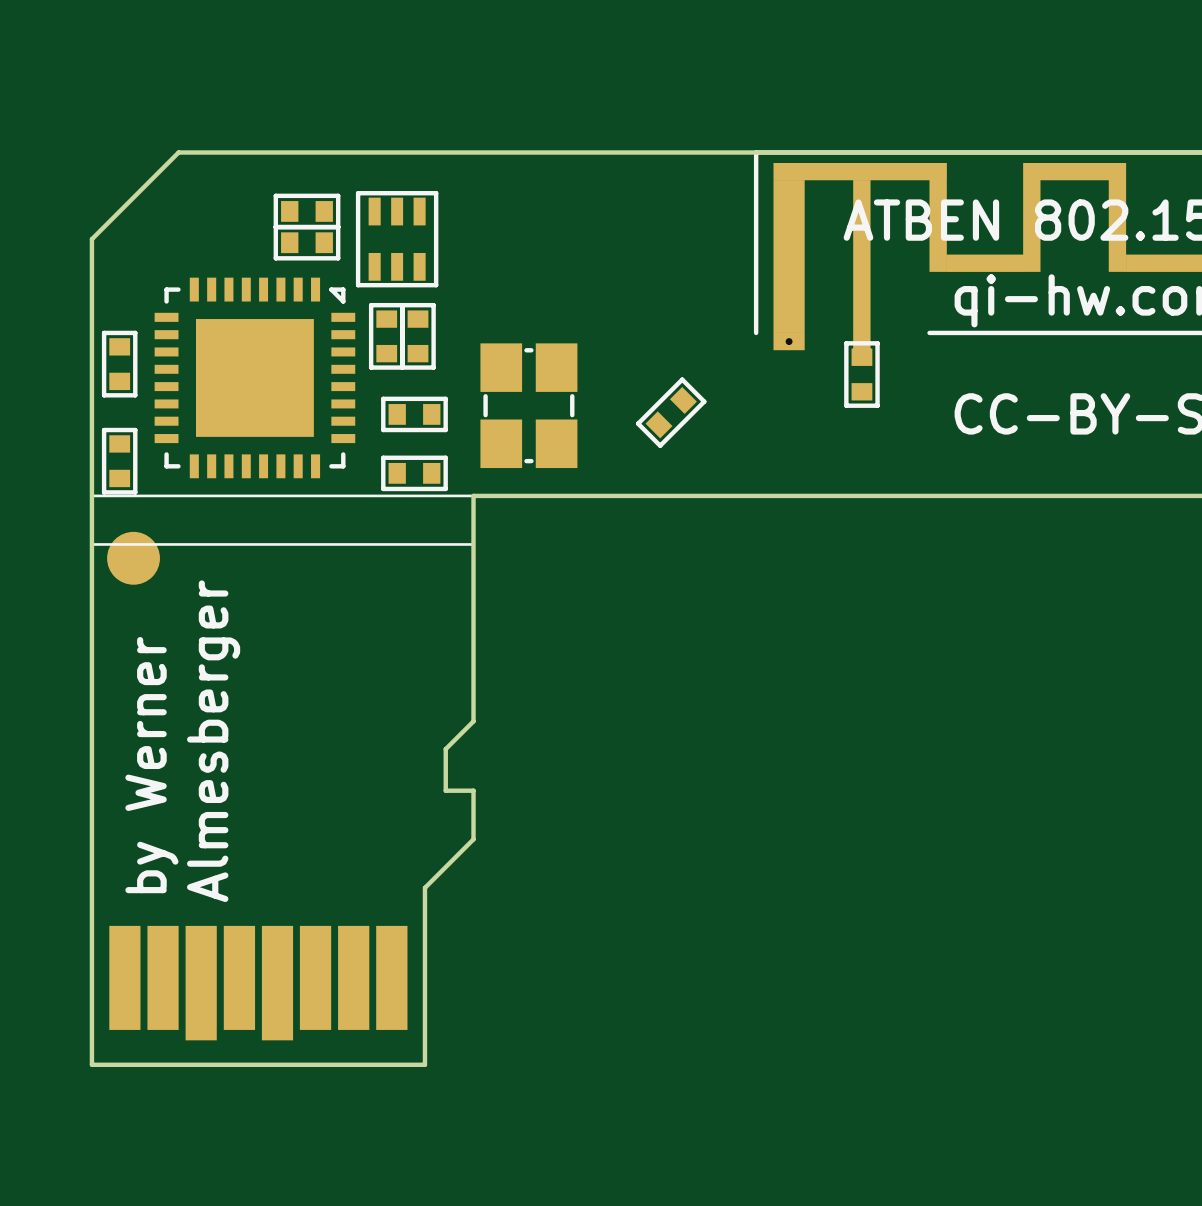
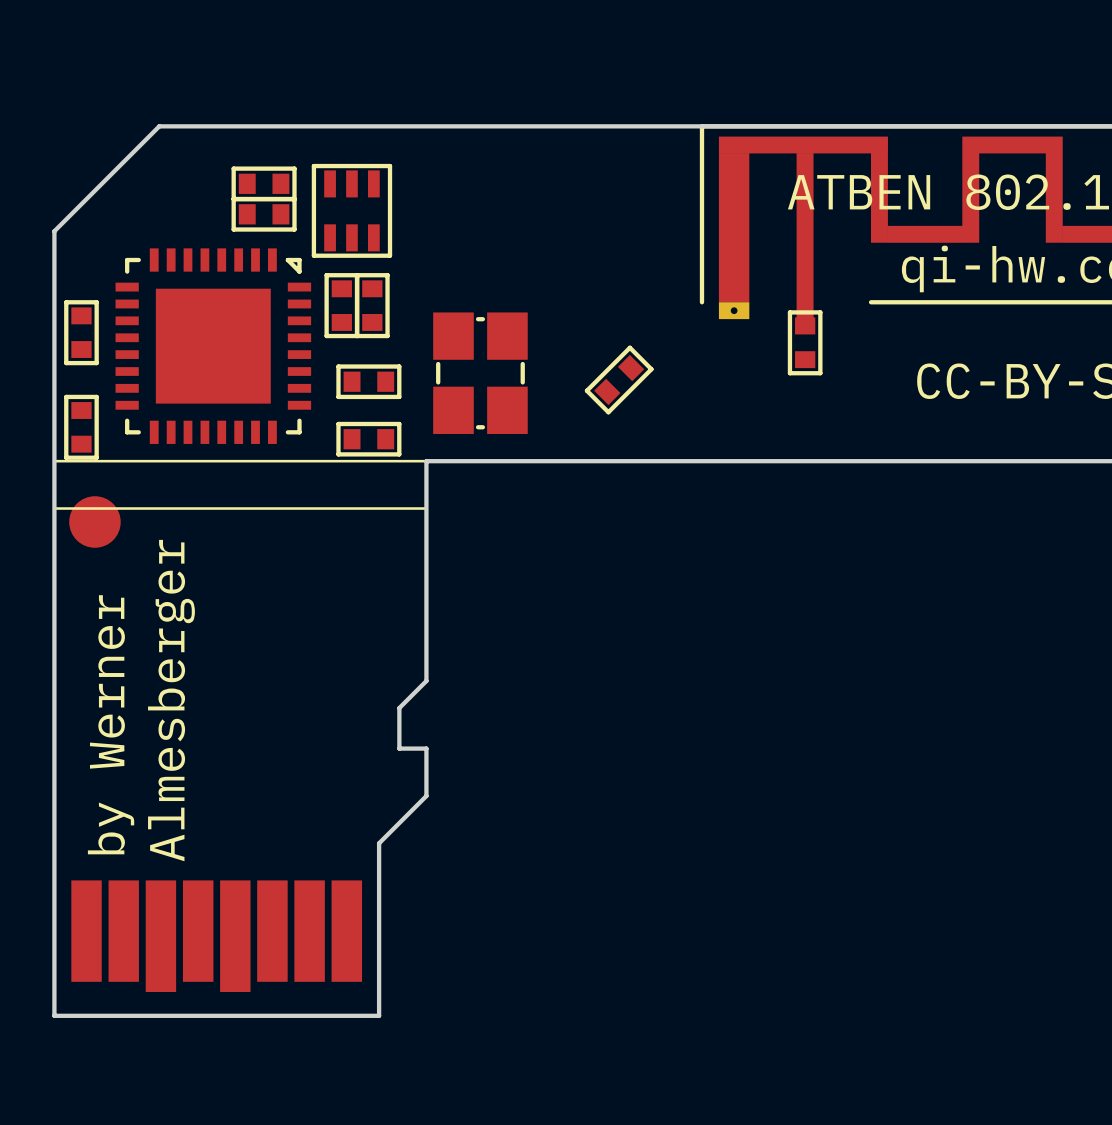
board edge: (199, 152) (178, 152) (91, 239) (91, 260) -> (159, 126) (54, 231)

